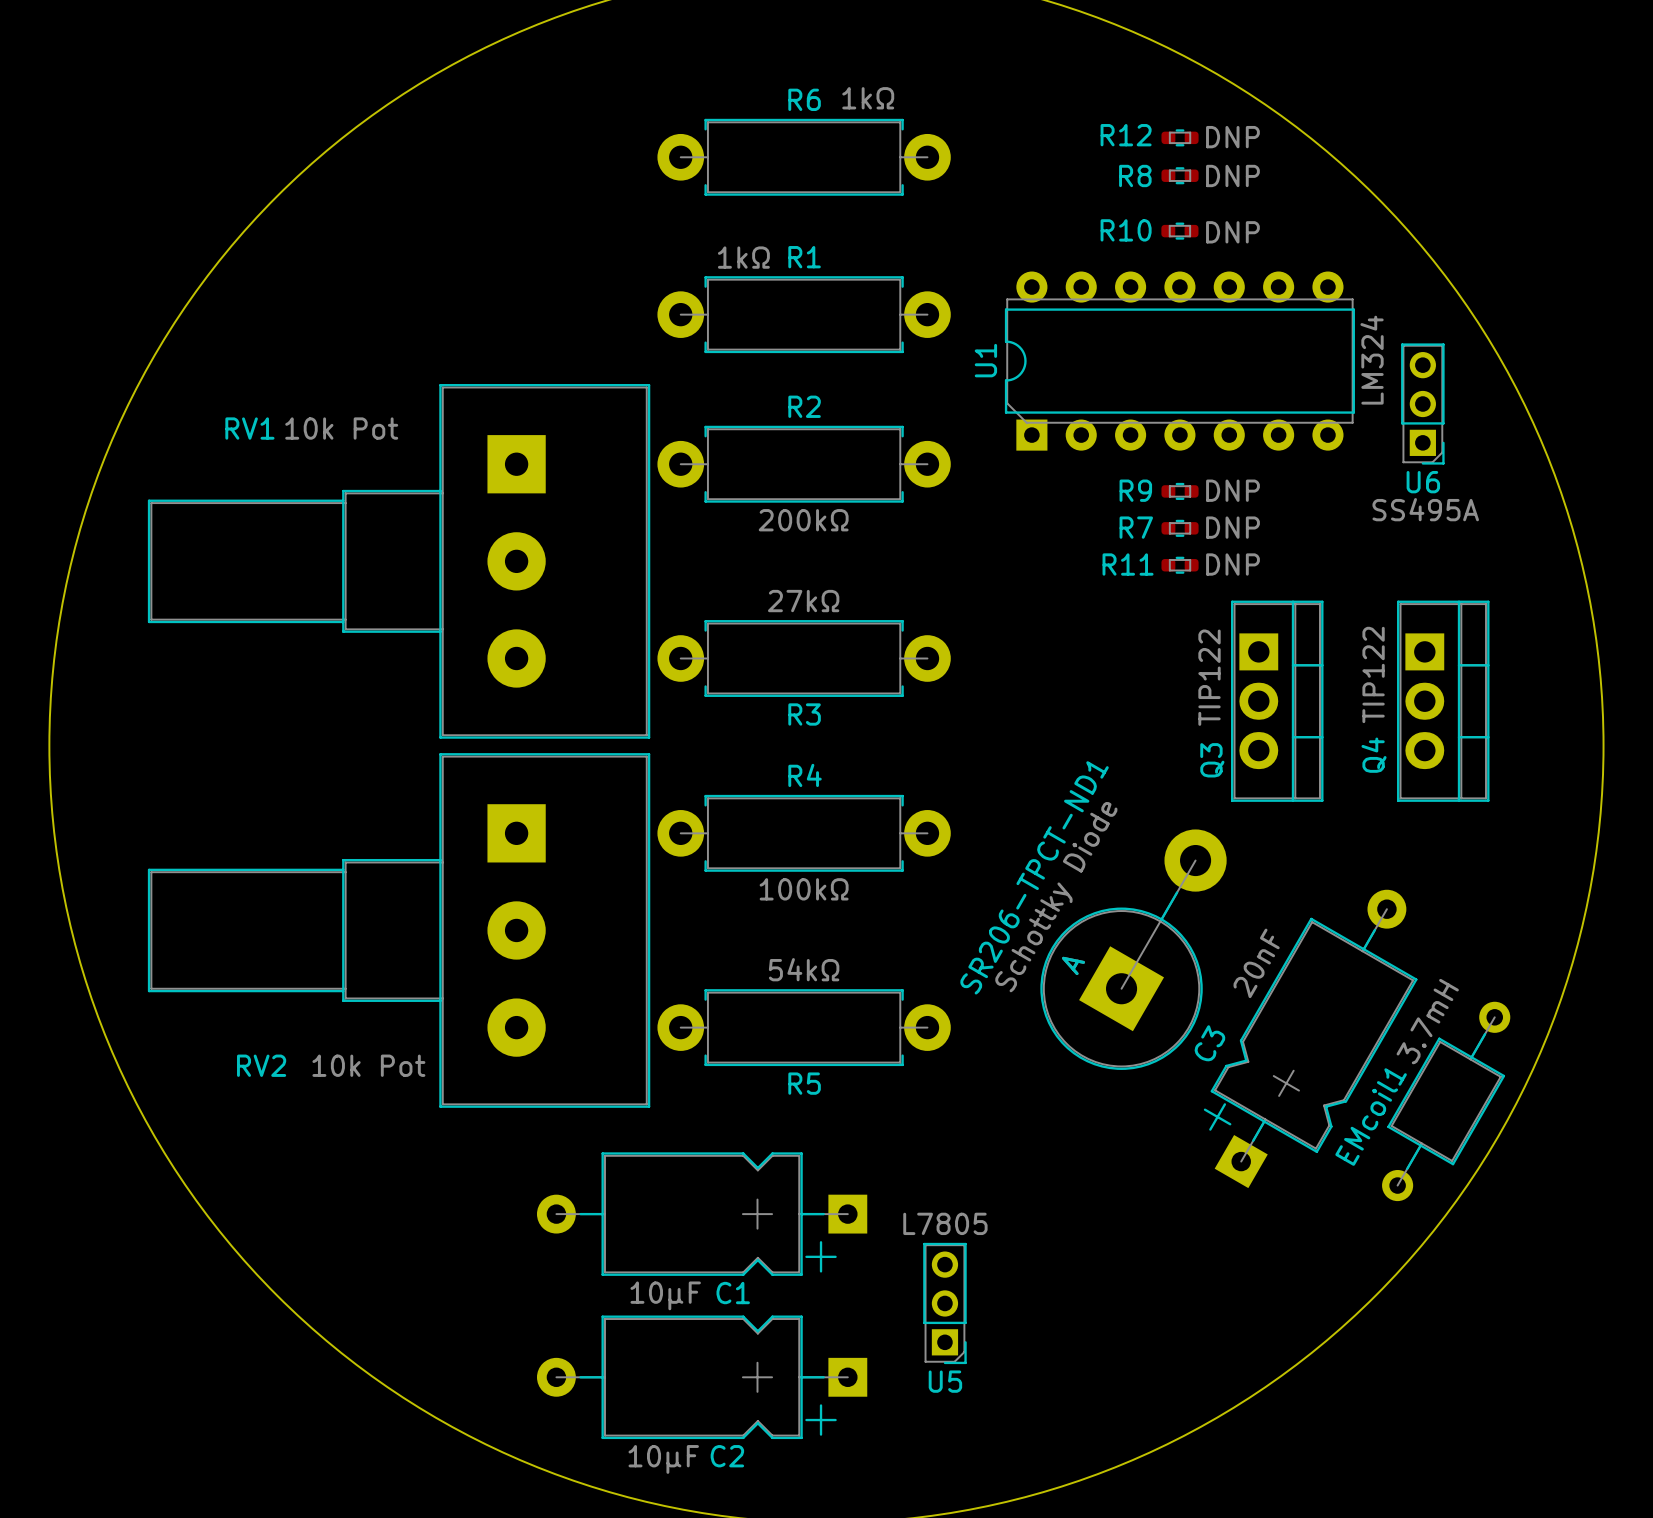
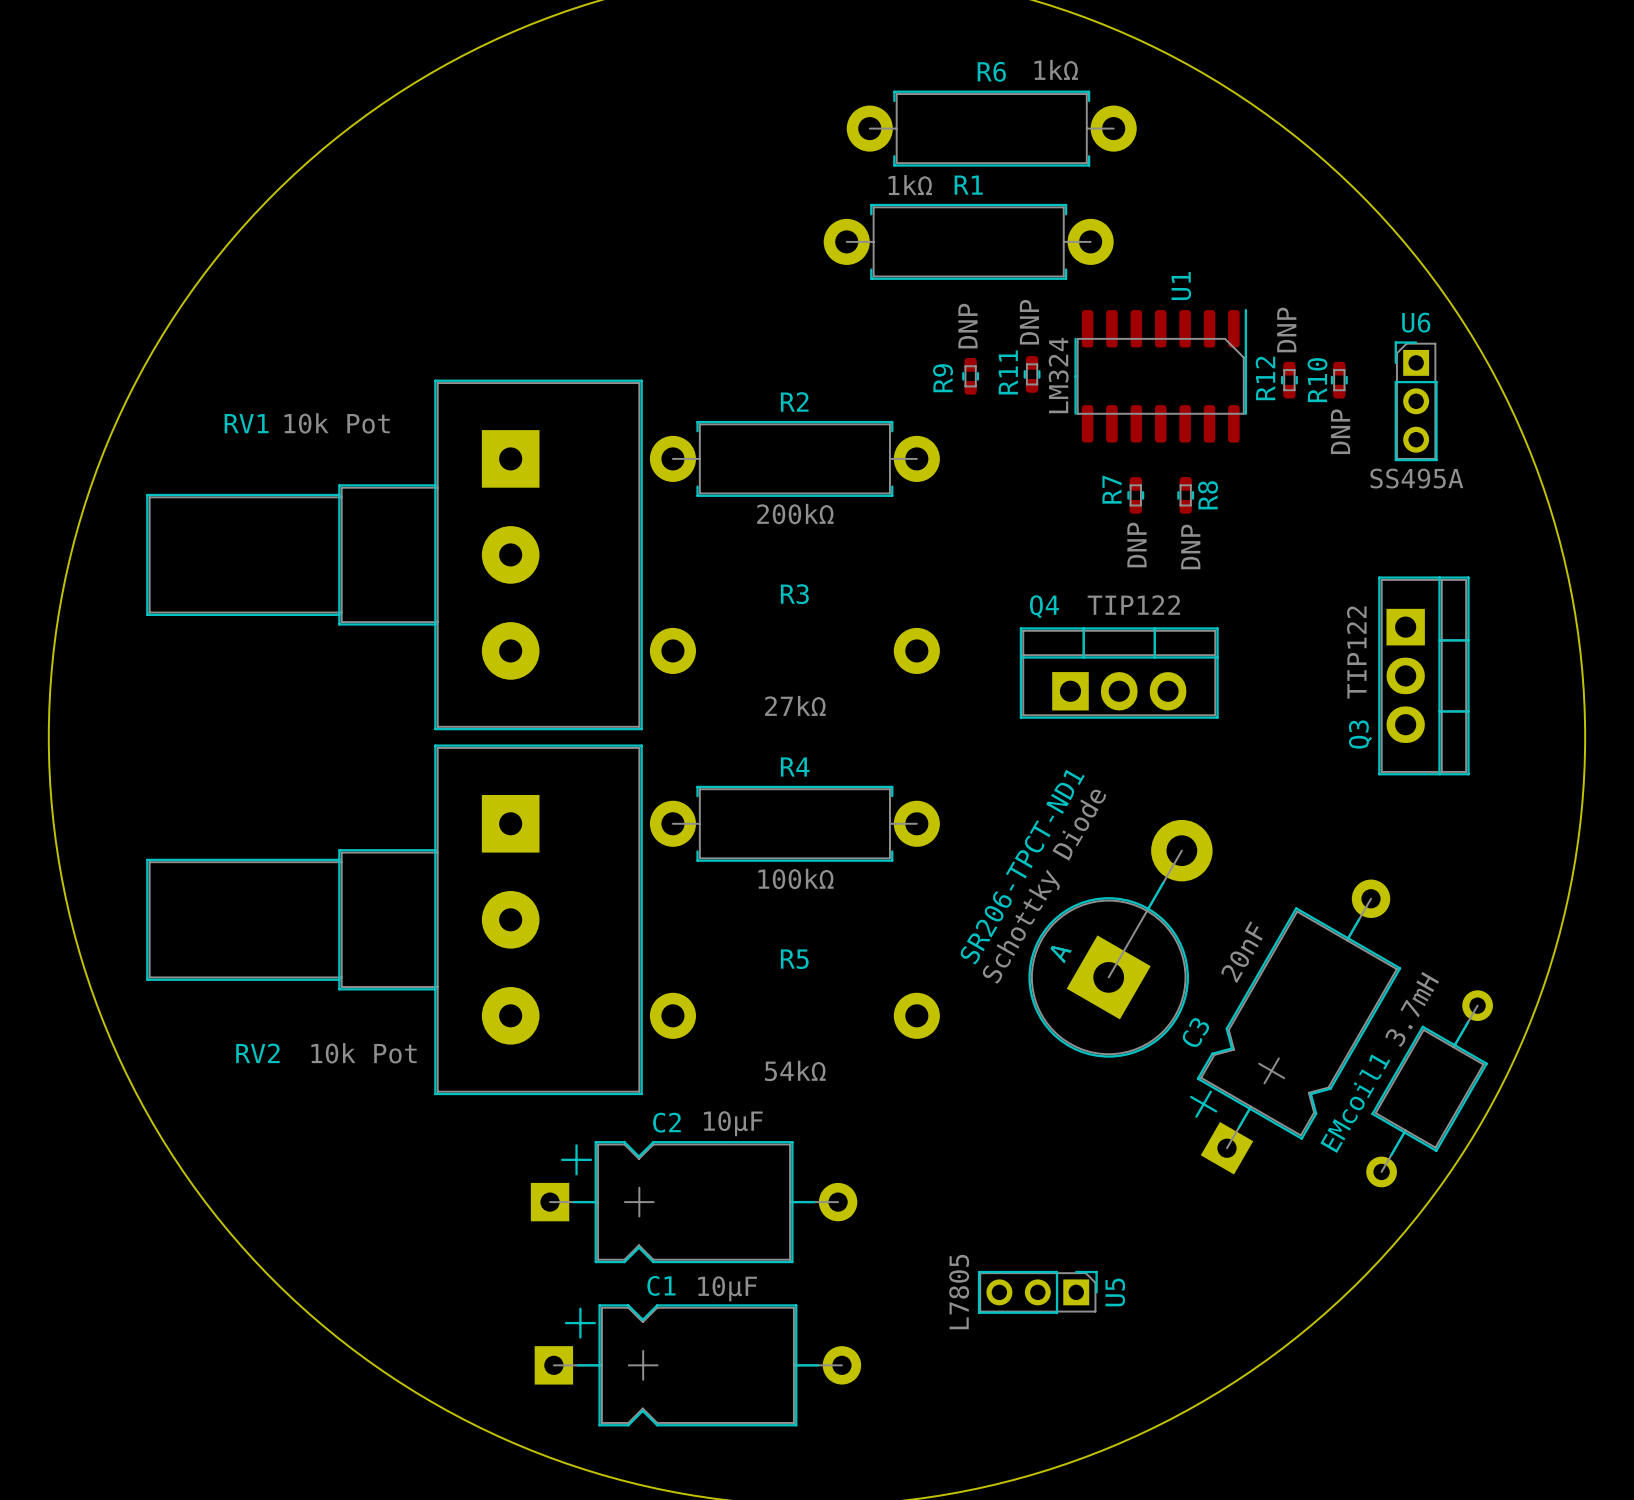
R12 rotation: 0° (1180, 137) -> 90° clockwise (1289, 380)
R12 position: (1180, 137) -> (1289, 380)
R12 value position: DNP (1232, 137) -> DNP (1286, 329)
R6 position: (804, 157) -> (991, 128)
R8 name position: R8 (1135, 175) -> R8 (1208, 495)
R8 rotation: 0° (1180, 175) -> 90° clockwise (1185, 495)
R8 position: (1180, 175) -> (1185, 495)
R10 rotation: 0° (1179, 231) -> 90° clockwise (1339, 380)
R10 position: (1179, 231) -> (1339, 380)
U1 footprint: [1004, 271, 1355, 451] -> [1074, 308, 1248, 443]
R1 position: (804, 314) -> (968, 241)
U1 name position: U1 (985, 360) -> U1 (1181, 286)
U1 value position: LM324 (1372, 360) -> LM324 (1058, 375)
U6 rotation: 0° (1422, 404) -> 180° (1416, 401)
R9 value position: DNP (1232, 490) -> DNP (967, 326)
R9 rotation: 0° (1180, 491) -> 90° clockwise (970, 376)
R9 position: (1180, 491) -> (970, 376)
R7 rotation: 0° (1180, 528) -> 90° clockwise (1135, 495)
R7 position: (1180, 528) -> (1135, 495)
R11 value position: DNP (1232, 564) -> DNP (1029, 322)
R11 rotation: 0° (1180, 565) -> 90° clockwise (1032, 374)
R11 position: (1180, 565) -> (1032, 374)
R3 side: top (804, 658) -> bottom (794, 650)
Q4 value position: TIP122 (1373, 674) -> TIP122 (1133, 605)
Q3 position: (1277, 701) -> (1423, 675)
Q4 rotation: 0° (1443, 701) -> 90° counterclockwise (1119, 673)
Q4 position: (1443, 701) -> (1119, 673)
Q4 name position: Q4 (1374, 755) -> Q4 (1044, 606)
R5 side: top (804, 1027) -> bottom (794, 1015)
C1 rotation: 0° (702, 1214) -> 180° (697, 1365)
U5 rotation: 0° (944, 1303) -> 90° counterclockwise (1037, 1292)
U5 position: (944, 1303) -> (1037, 1292)
C2 rotation: 0° (702, 1377) -> 180° (694, 1202)

